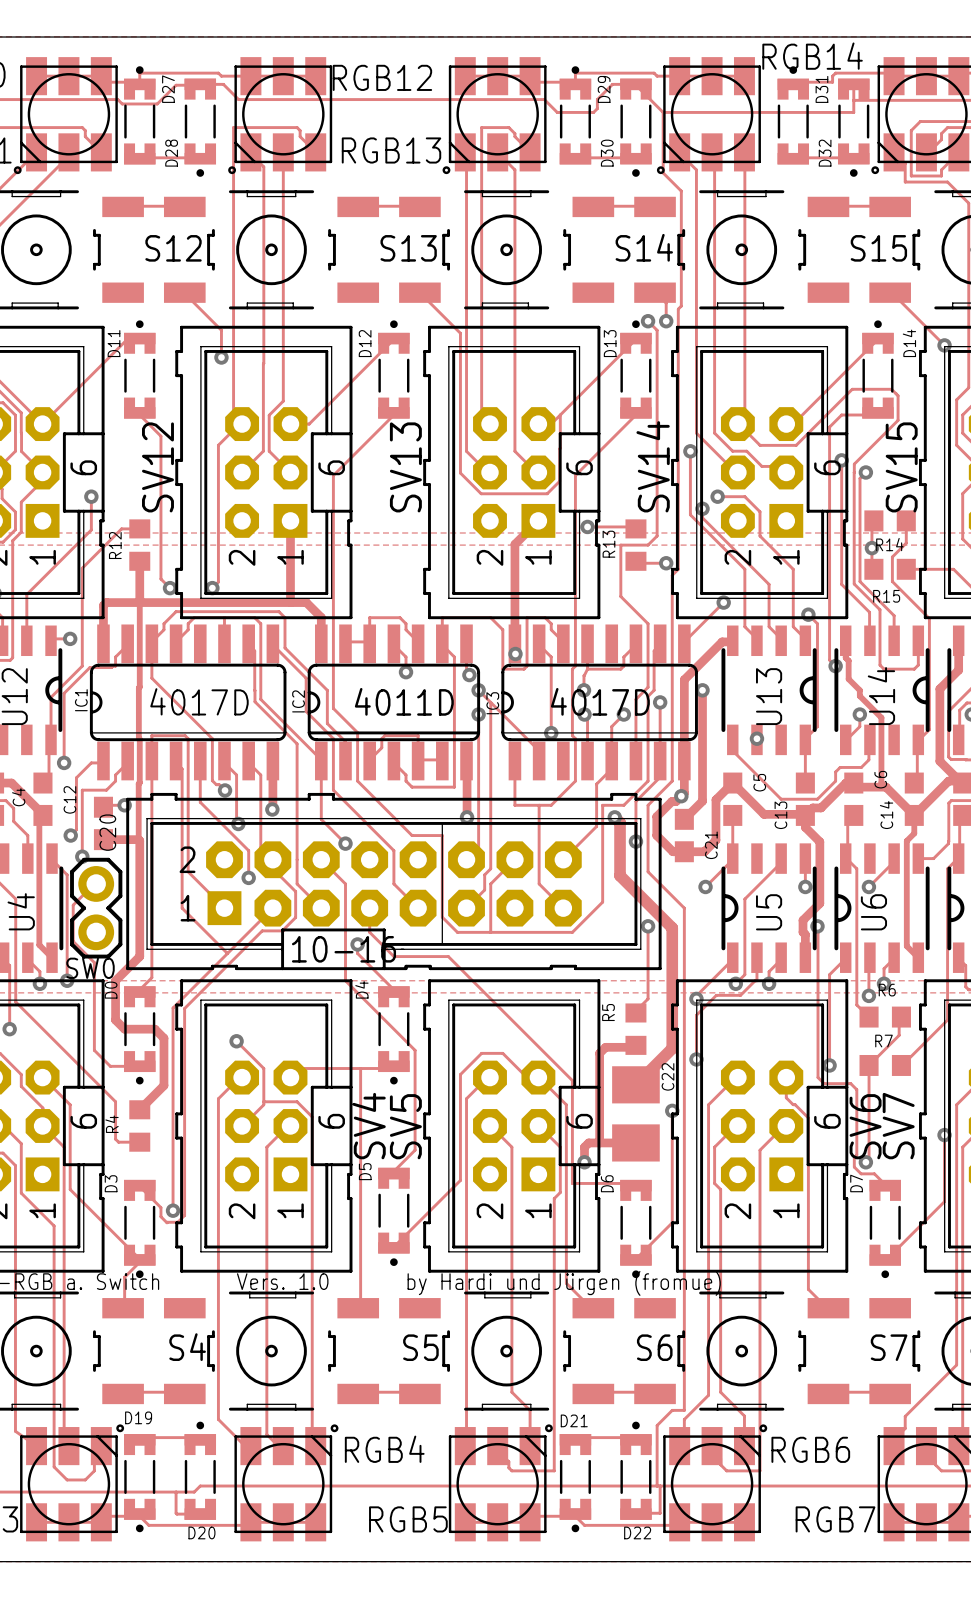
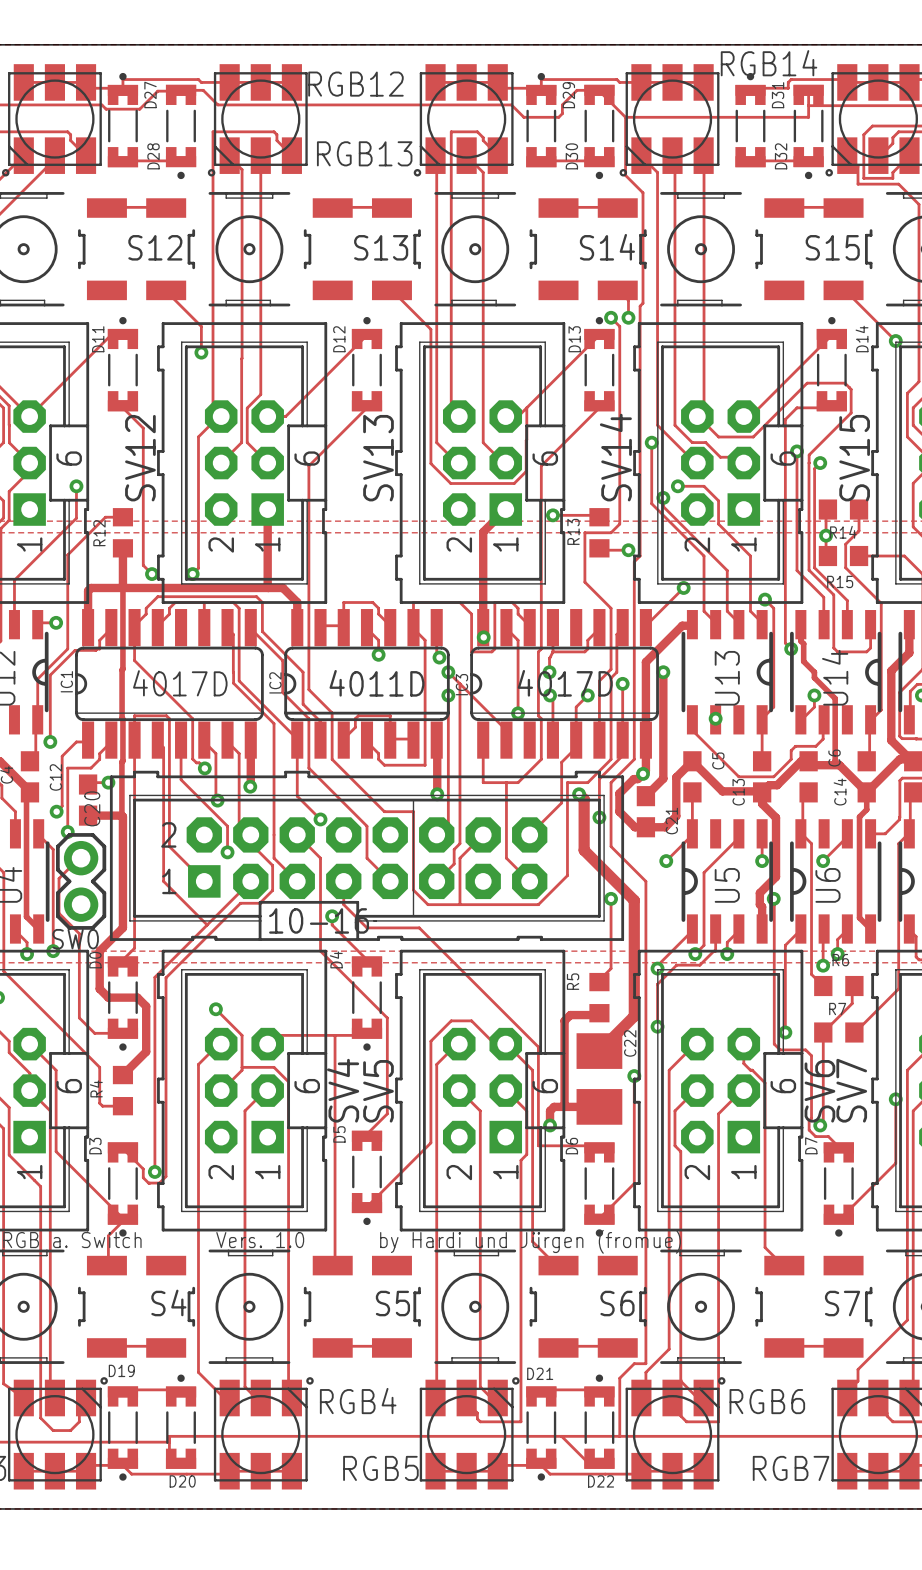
track: (511, 1392) (530, 1410) (530, 1446) -> (480, 1346) (480, 1386) (491, 1398)
track: (720, 1392) (744, 1416) (744, 1446) -> (680, 1346) (680, 1381) (697, 1398)
track: (200, 1486) (194, 1492) (188, 1492) -> (181, 1436) (169, 1436) (169, 1463)
track: none -> (561, 1436) (587, 1463)
track: (660, 1486) (660, 1513) (635, 1514) -> none
track: (176, 1492) (176, 1514) (200, 1514) -> none

